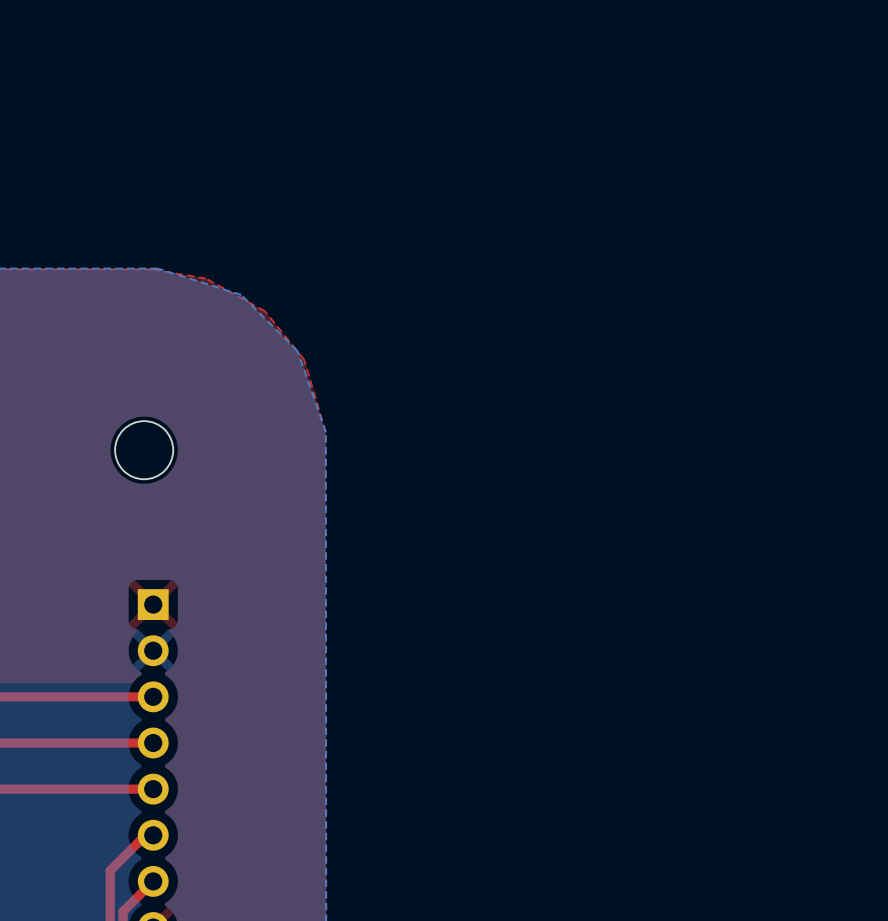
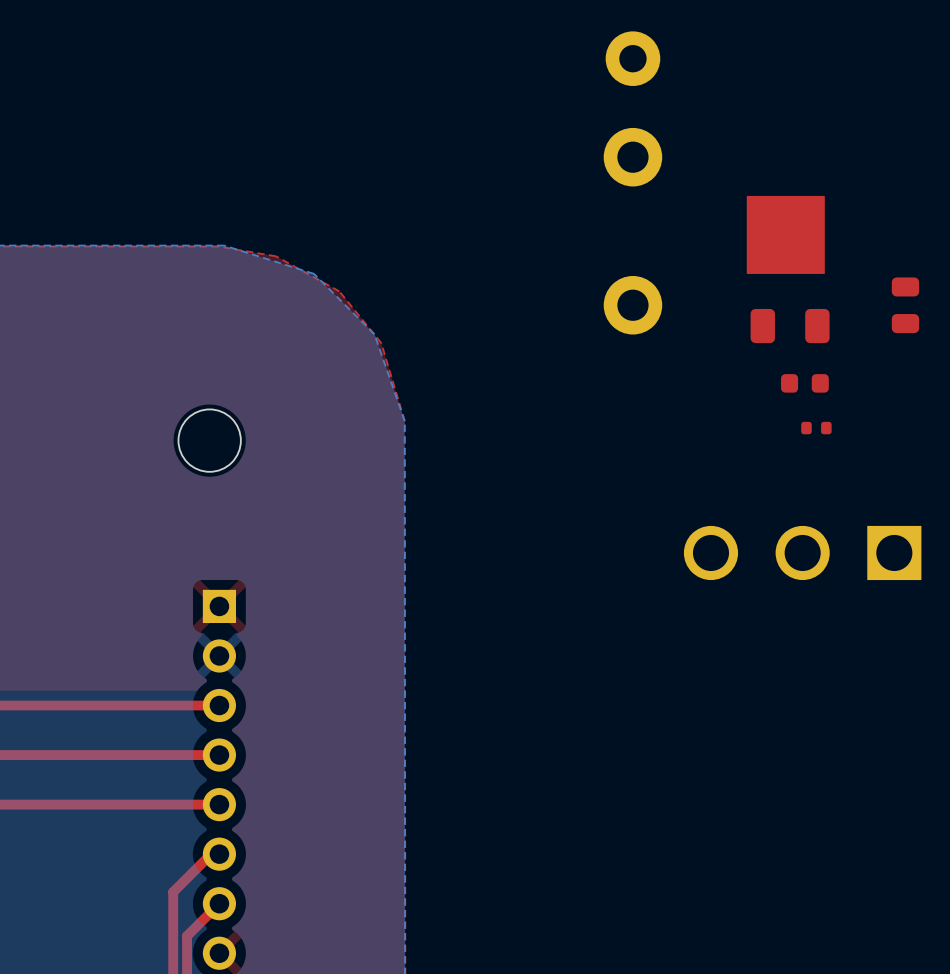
part: none -> (632, 58)
part: none -> (632, 157)
part: none -> (785, 234)
part: none -> (632, 305)
part: none -> (905, 305)
part: none -> (790, 326)
part: none -> (804, 383)
part: none -> (816, 428)
part: none -> (802, 552)

